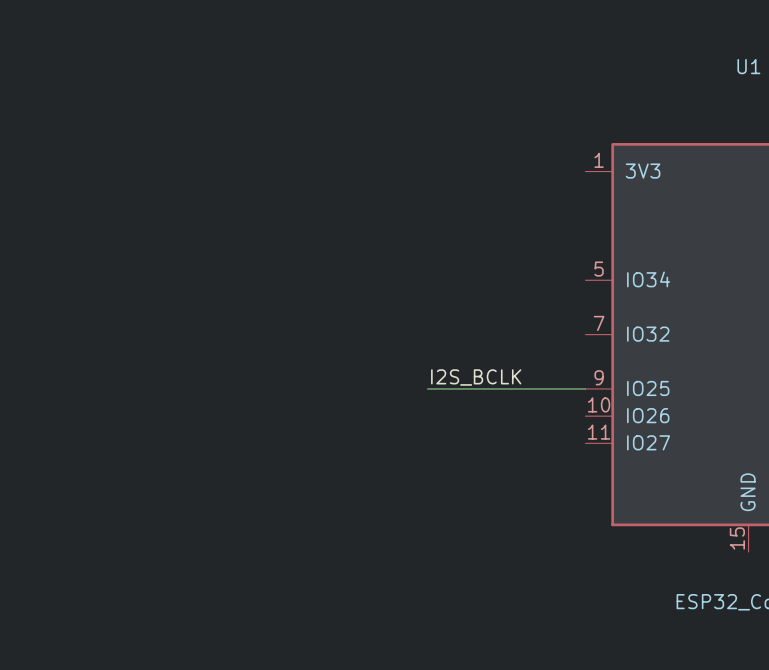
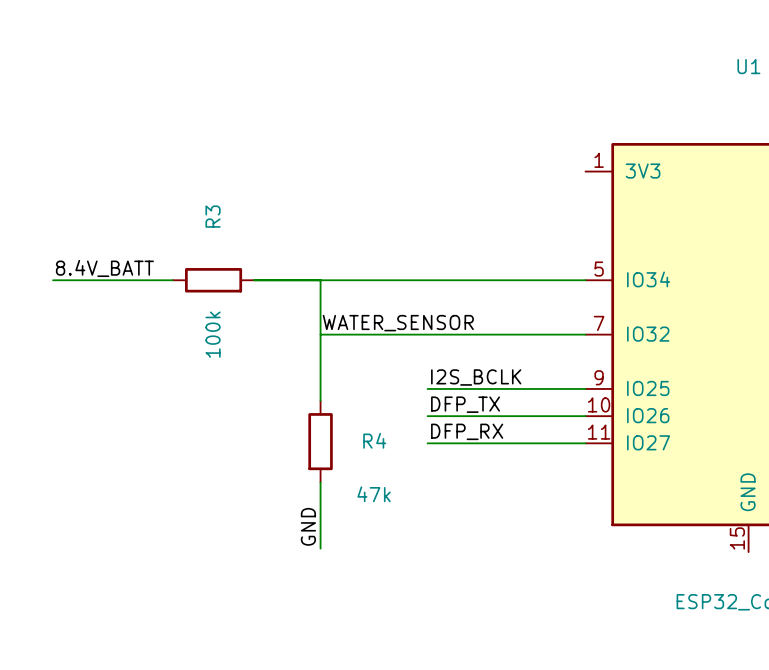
label: none -> 8.4V_BATT (104, 268)
wire: none -> (53, 280) (172, 280)
R3: none -> 100k (213, 280)
wire: none -> (254, 280) (585, 280)
wire: none -> (320, 280) (320, 400)
label: none -> WATER_SENSOR (398, 323)
wire: none -> (320, 334) (585, 334)
label: none -> DFP_TX (465, 404)
wire: none -> (427, 416) (585, 416)
label: none -> DFP_RX (467, 431)
R4: none -> 47k (320, 441)
wire: none -> (427, 443) (585, 443)
wire: none -> (320, 482) (320, 548)
label: none -> GND (308, 526)

